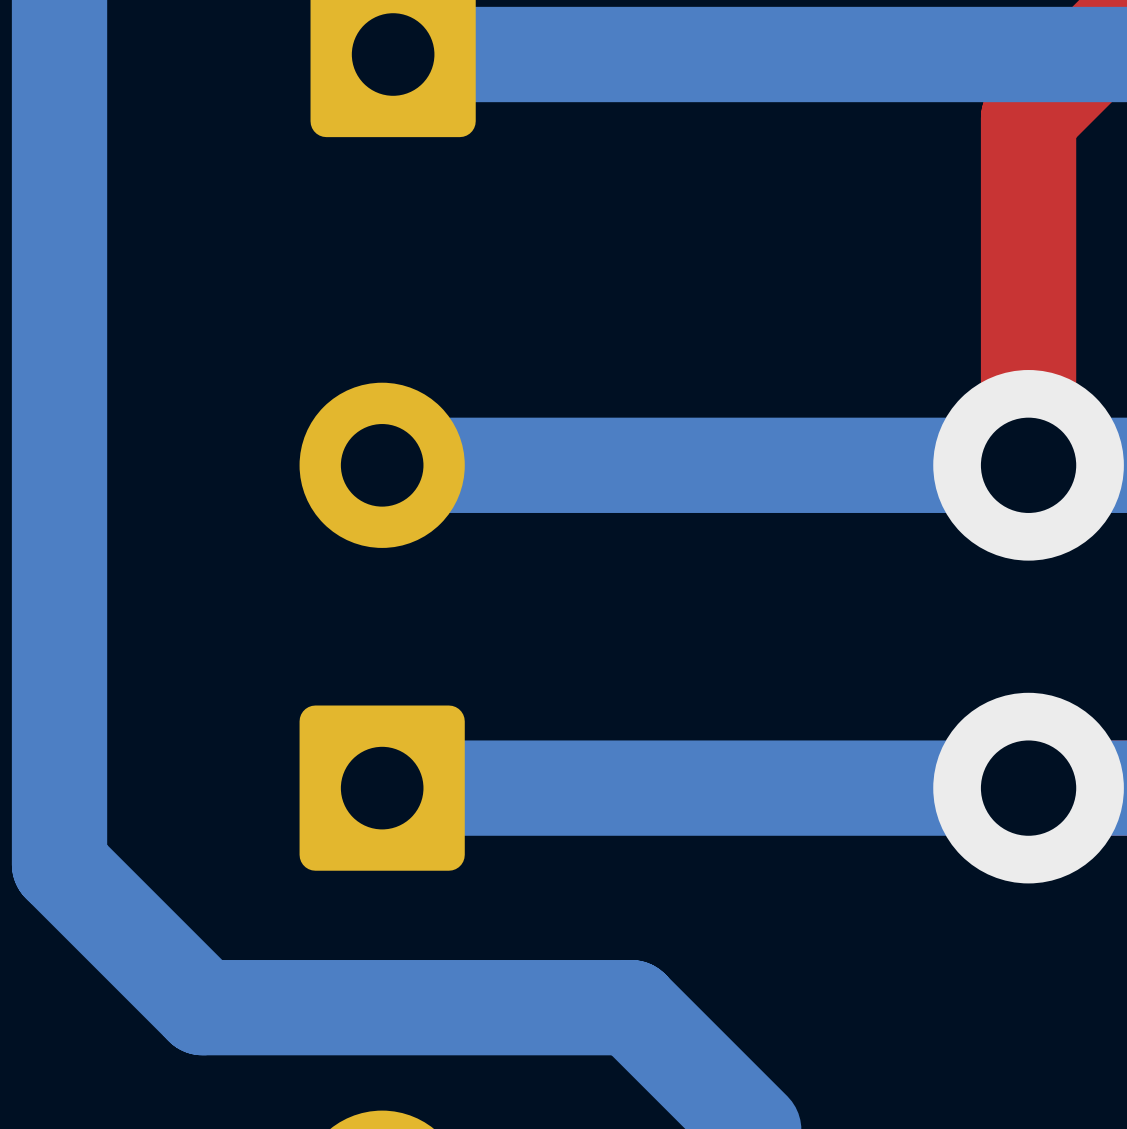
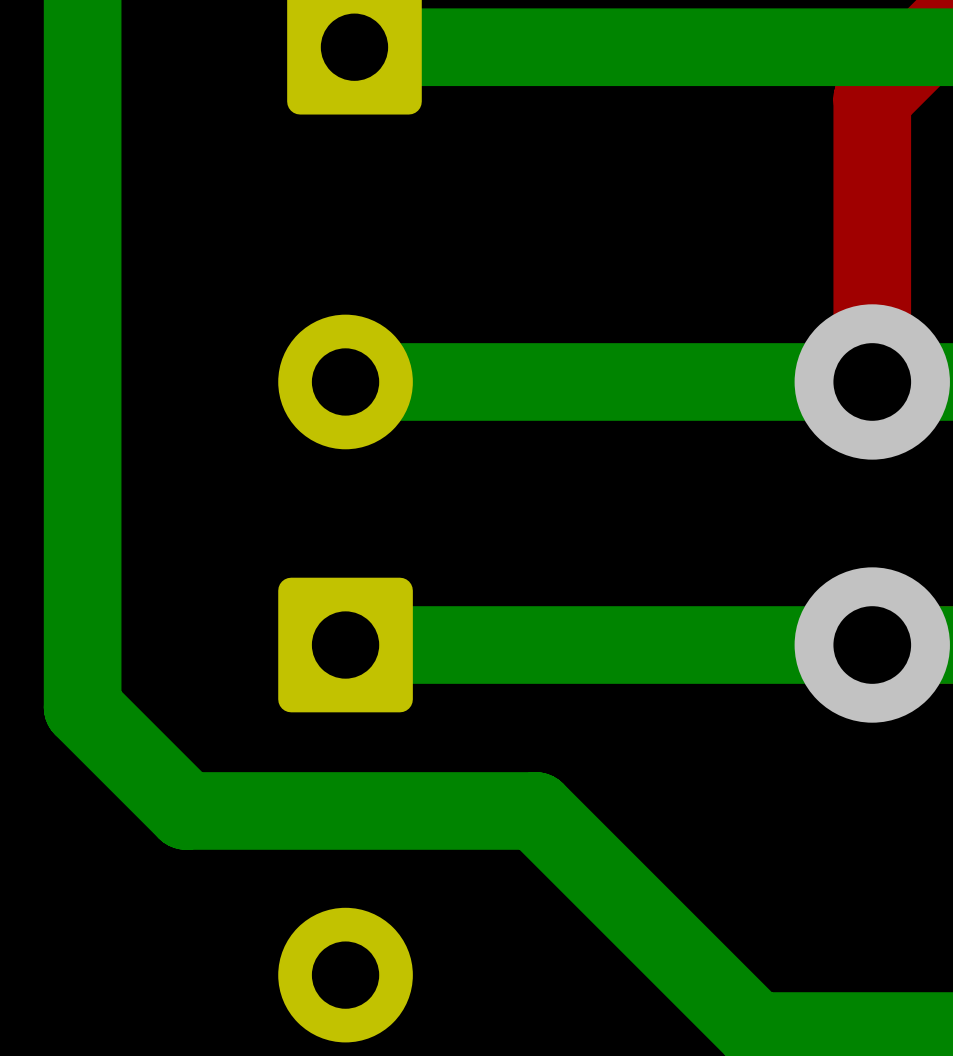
bottom track: (186, 991) (202, 1007) (631, 1007) -> (186, 810) (535, 810) (548, 823)

